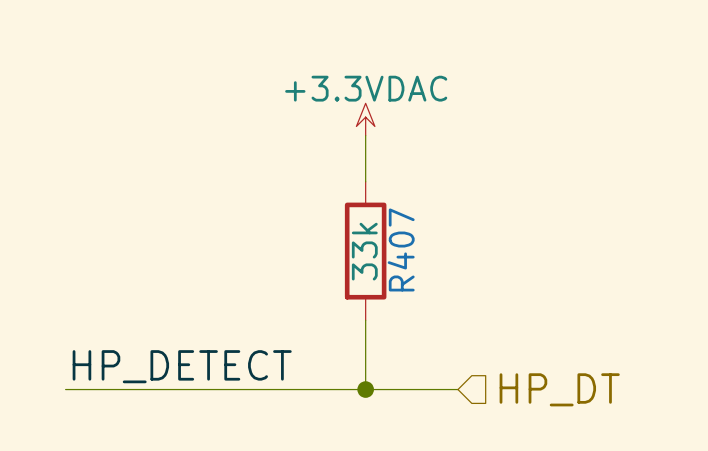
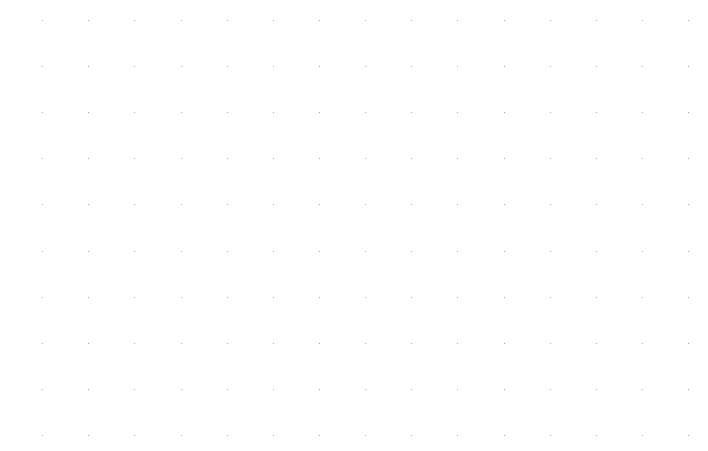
power symbol: +3.3VDAC (365, 119) -> none
wire: (365, 135) (365, 181) -> none
R407: 33k (365, 251) -> none
wire: (365, 320) (365, 389) -> none
label: HP_DETECT (182, 366) -> none
wire: (65, 389) (457, 389) -> none
junction: (365, 389) -> none
hierarchical label: HP_DT (559, 389) -> none

